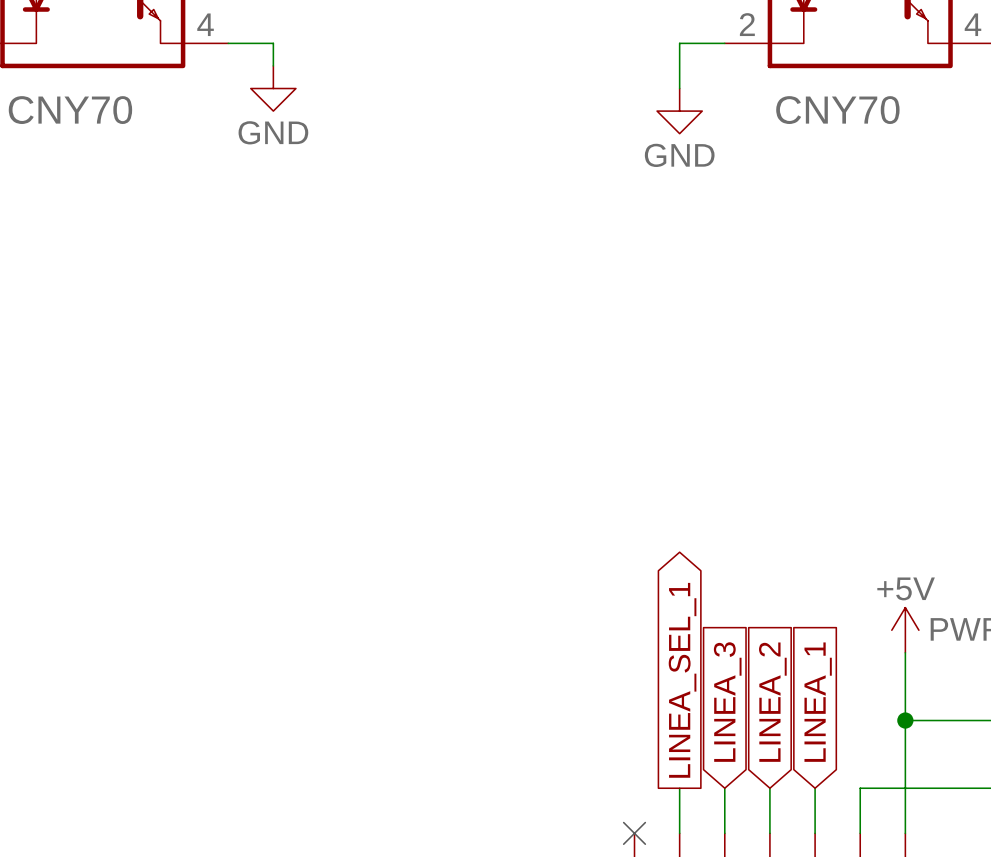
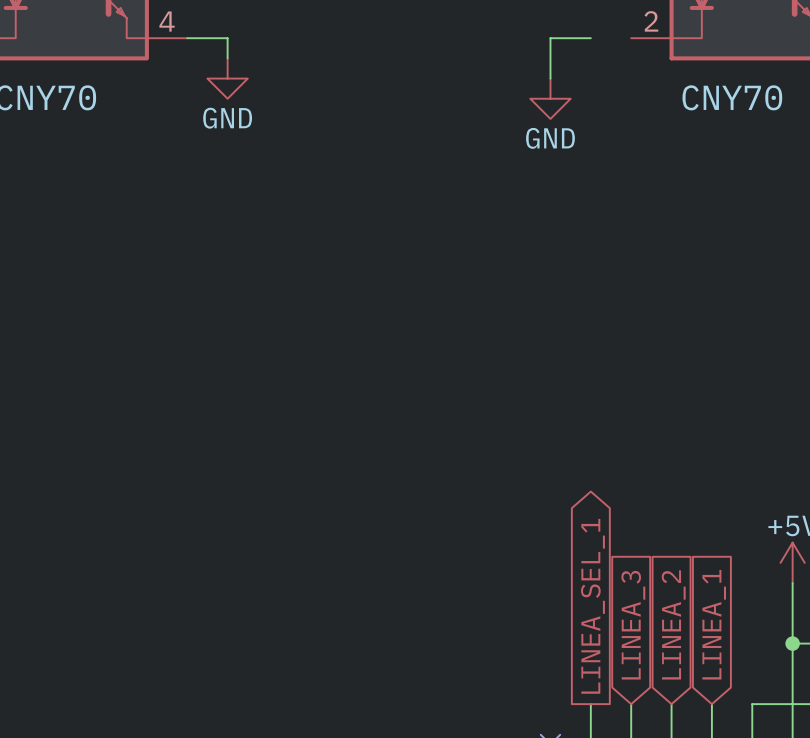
wire: (724, 43) (679, 43) (679, 88) -> (590, 38) (550, 38) (550, 78)
power symbol position: GND (679, 111) -> GND (550, 98)

